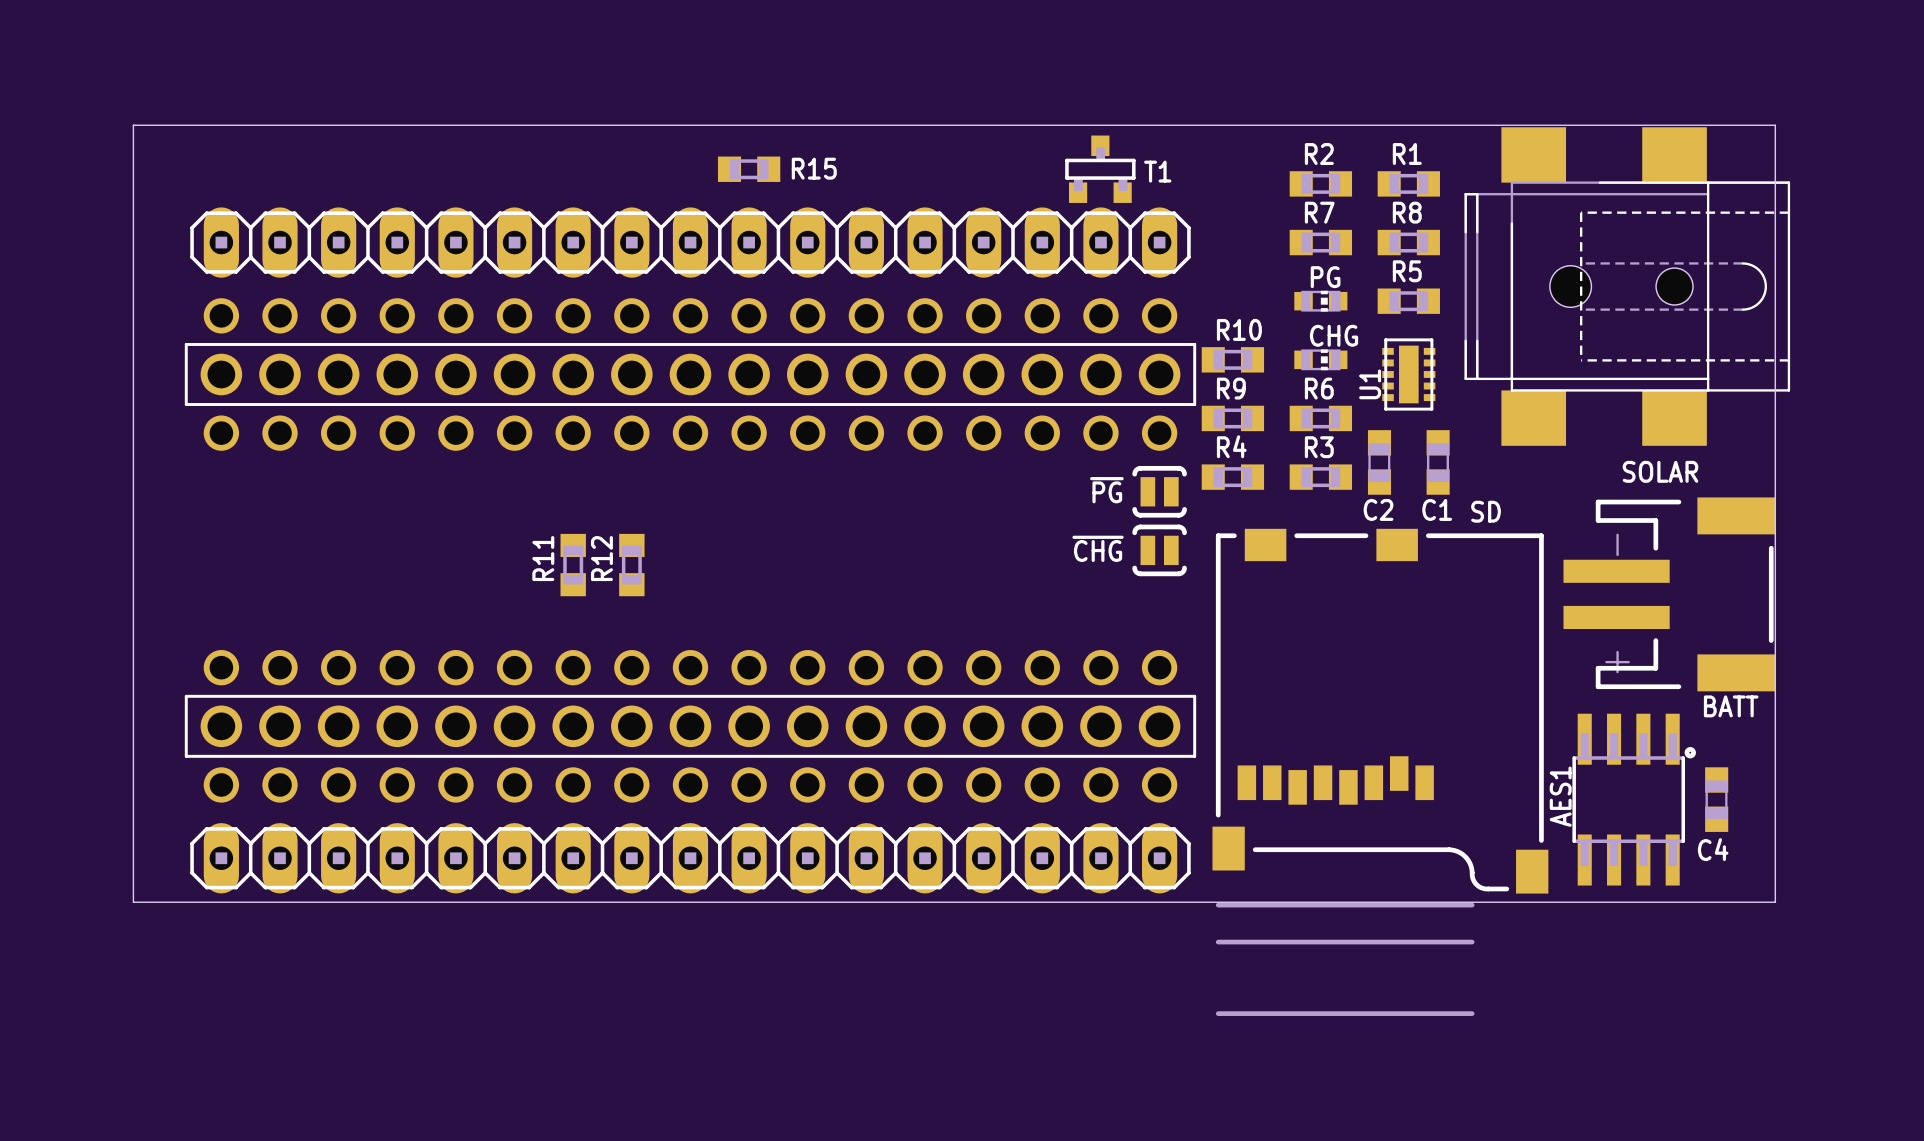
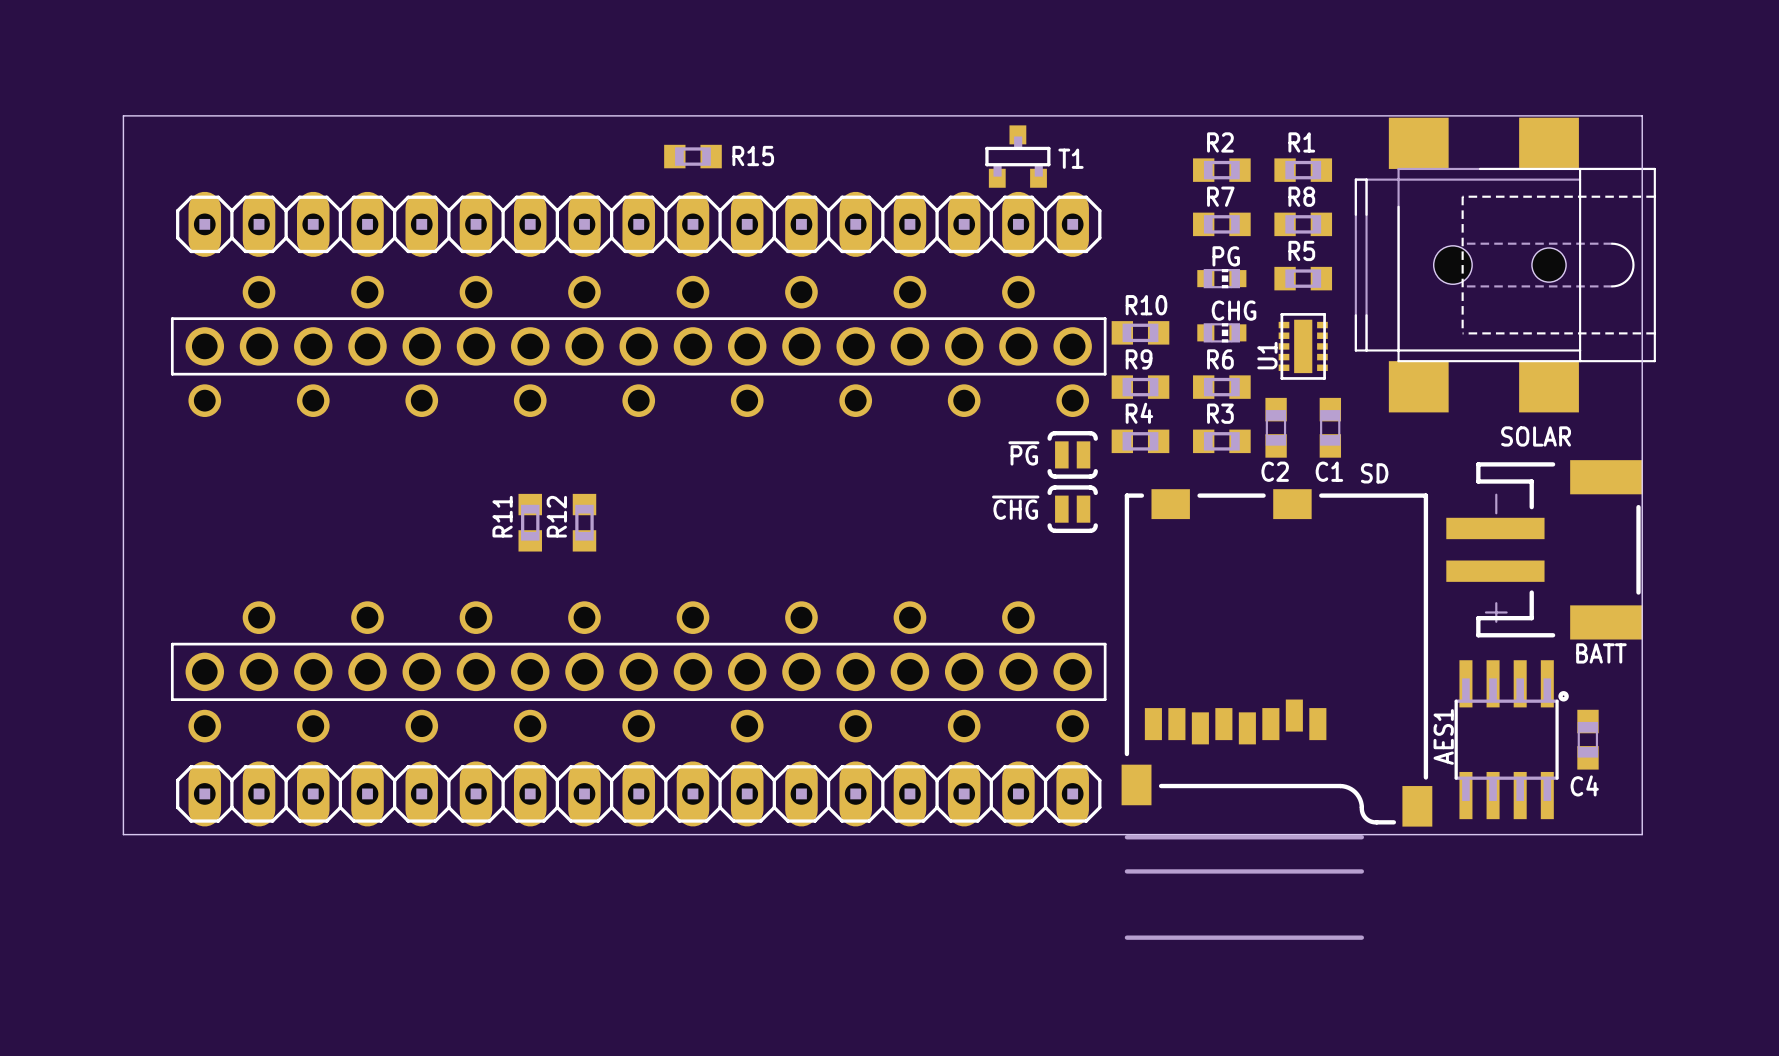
part footprint: [184, 298, 1197, 451] -> [170, 275, 1107, 418]
part footprint: [184, 650, 1197, 803] -> [170, 601, 1107, 743]

